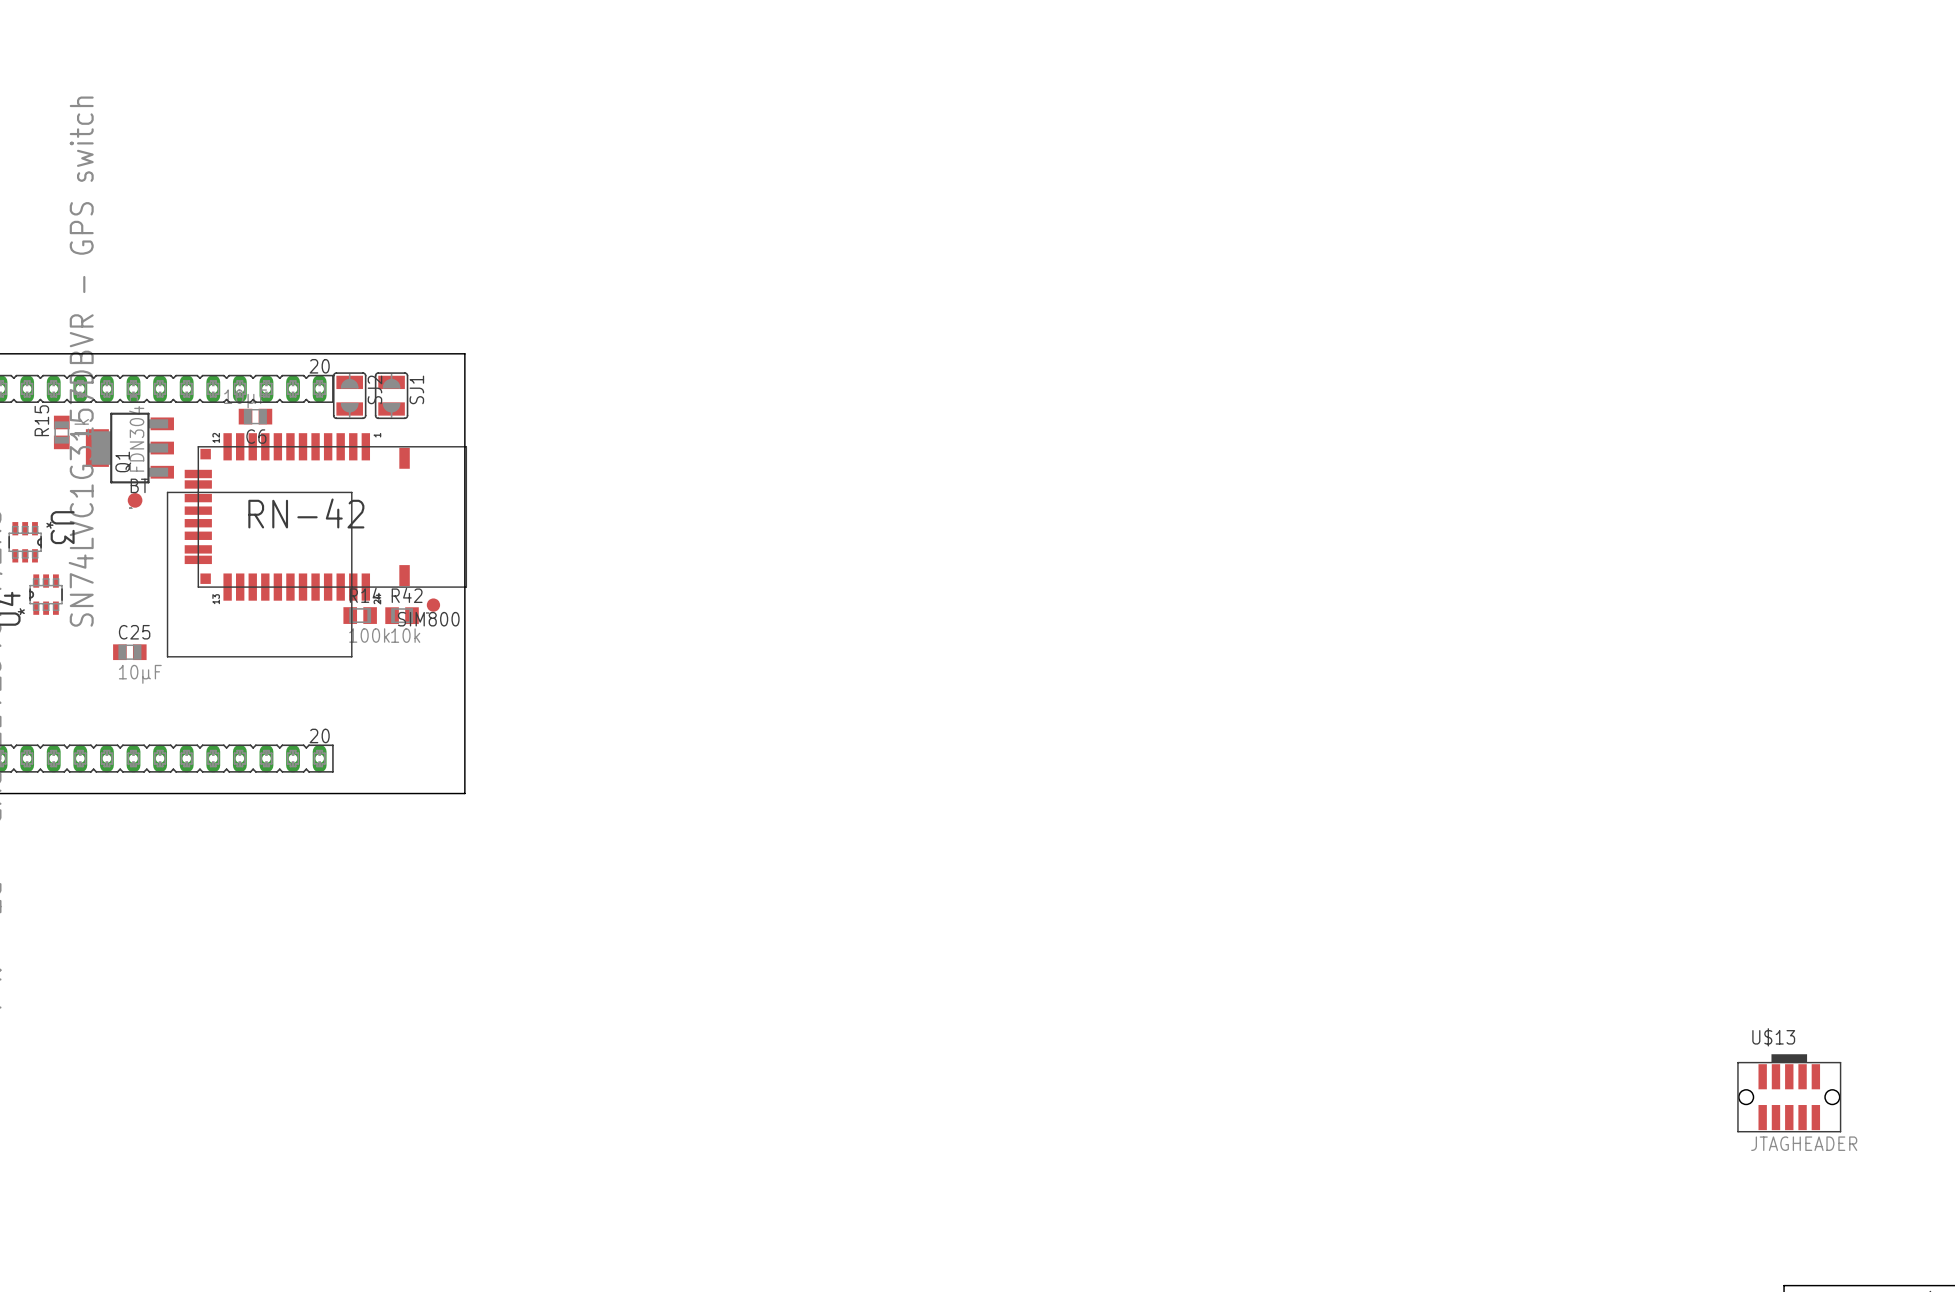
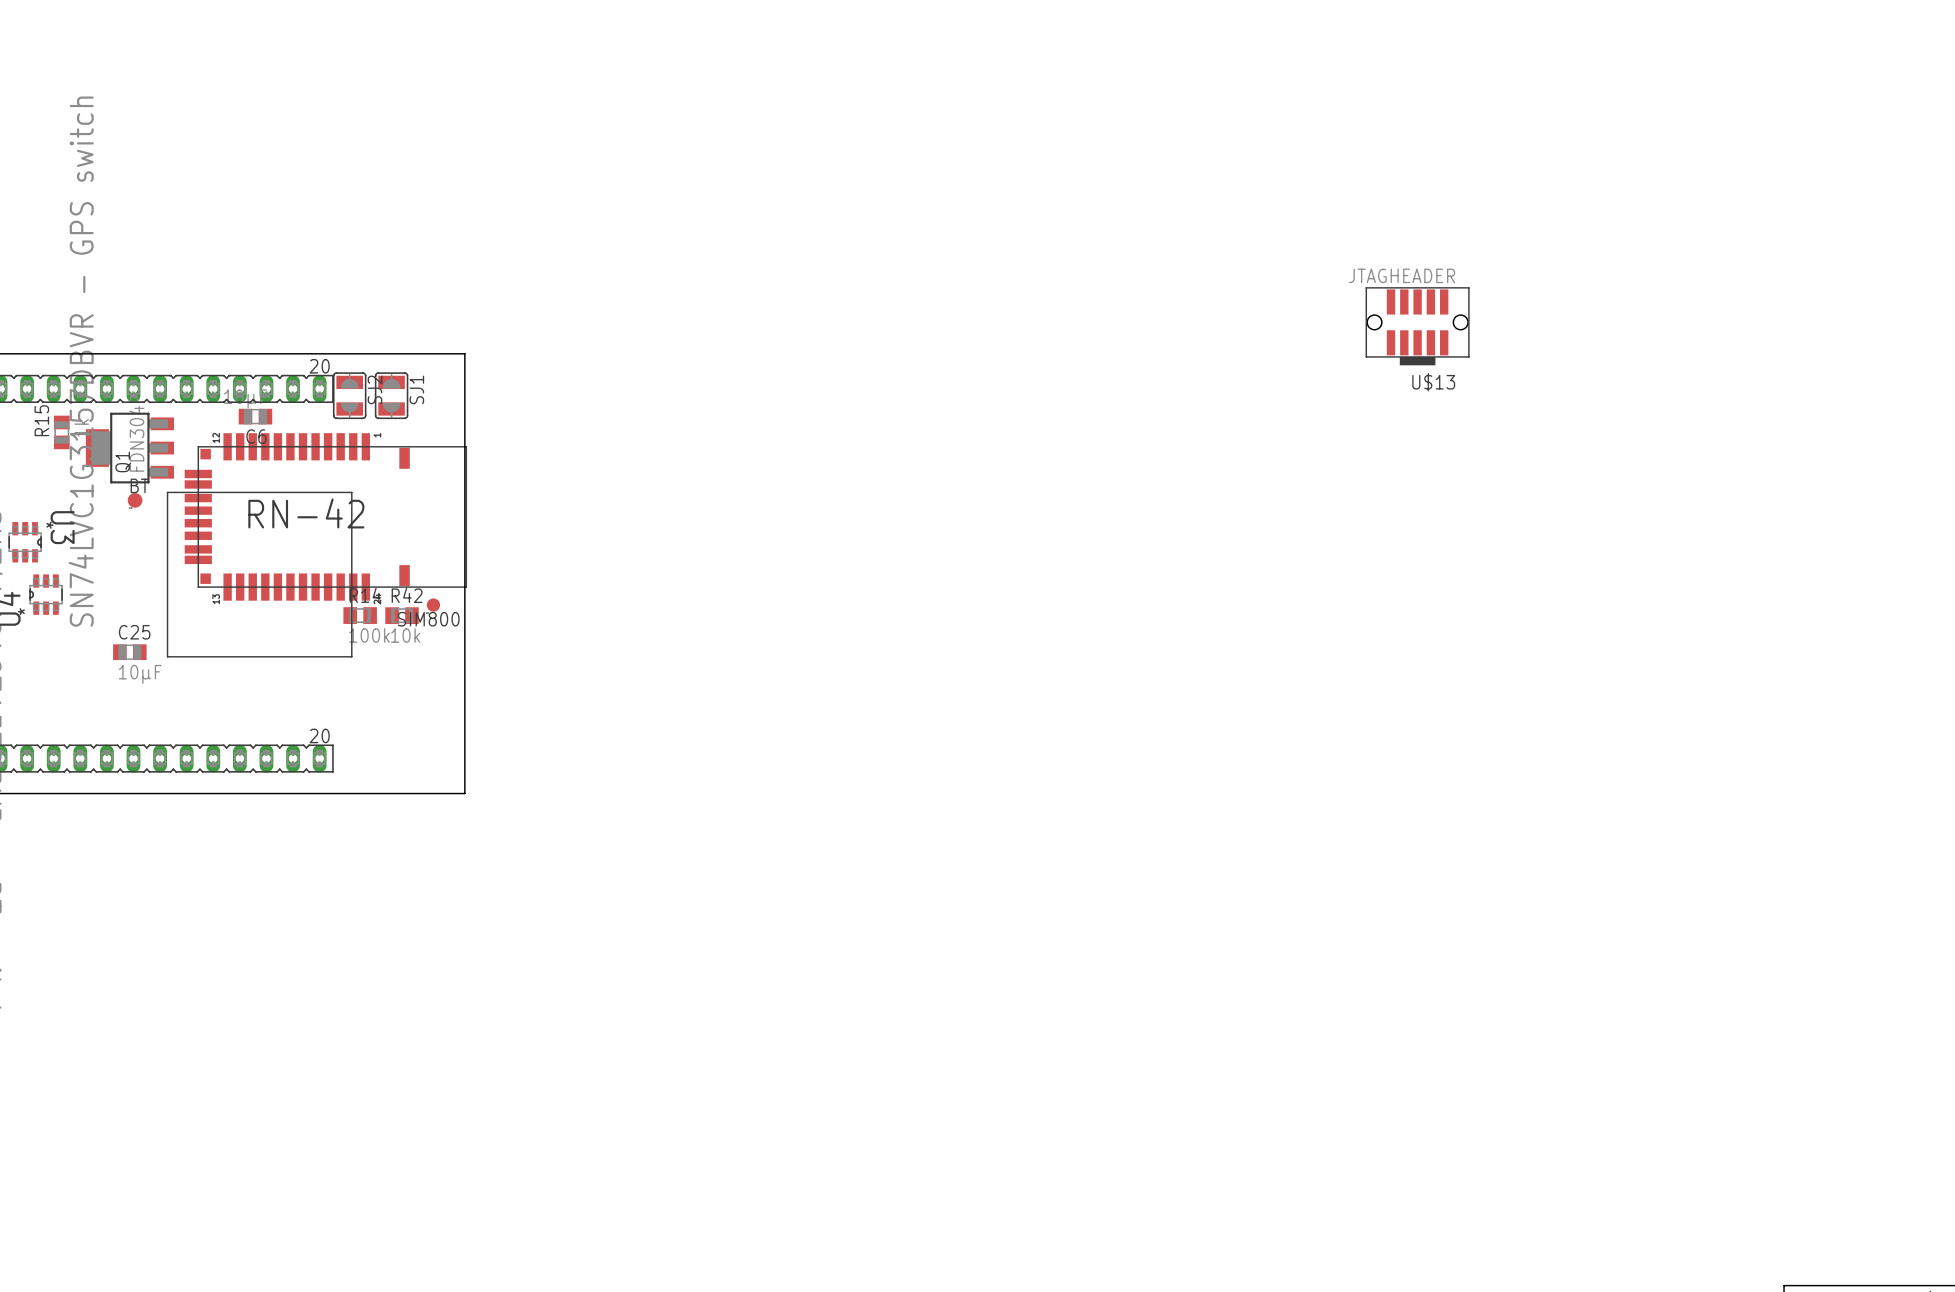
U$13 rotation: 0° (1789, 1093) -> 180° (1417, 326)
U$13 position: (1789, 1093) -> (1417, 326)

